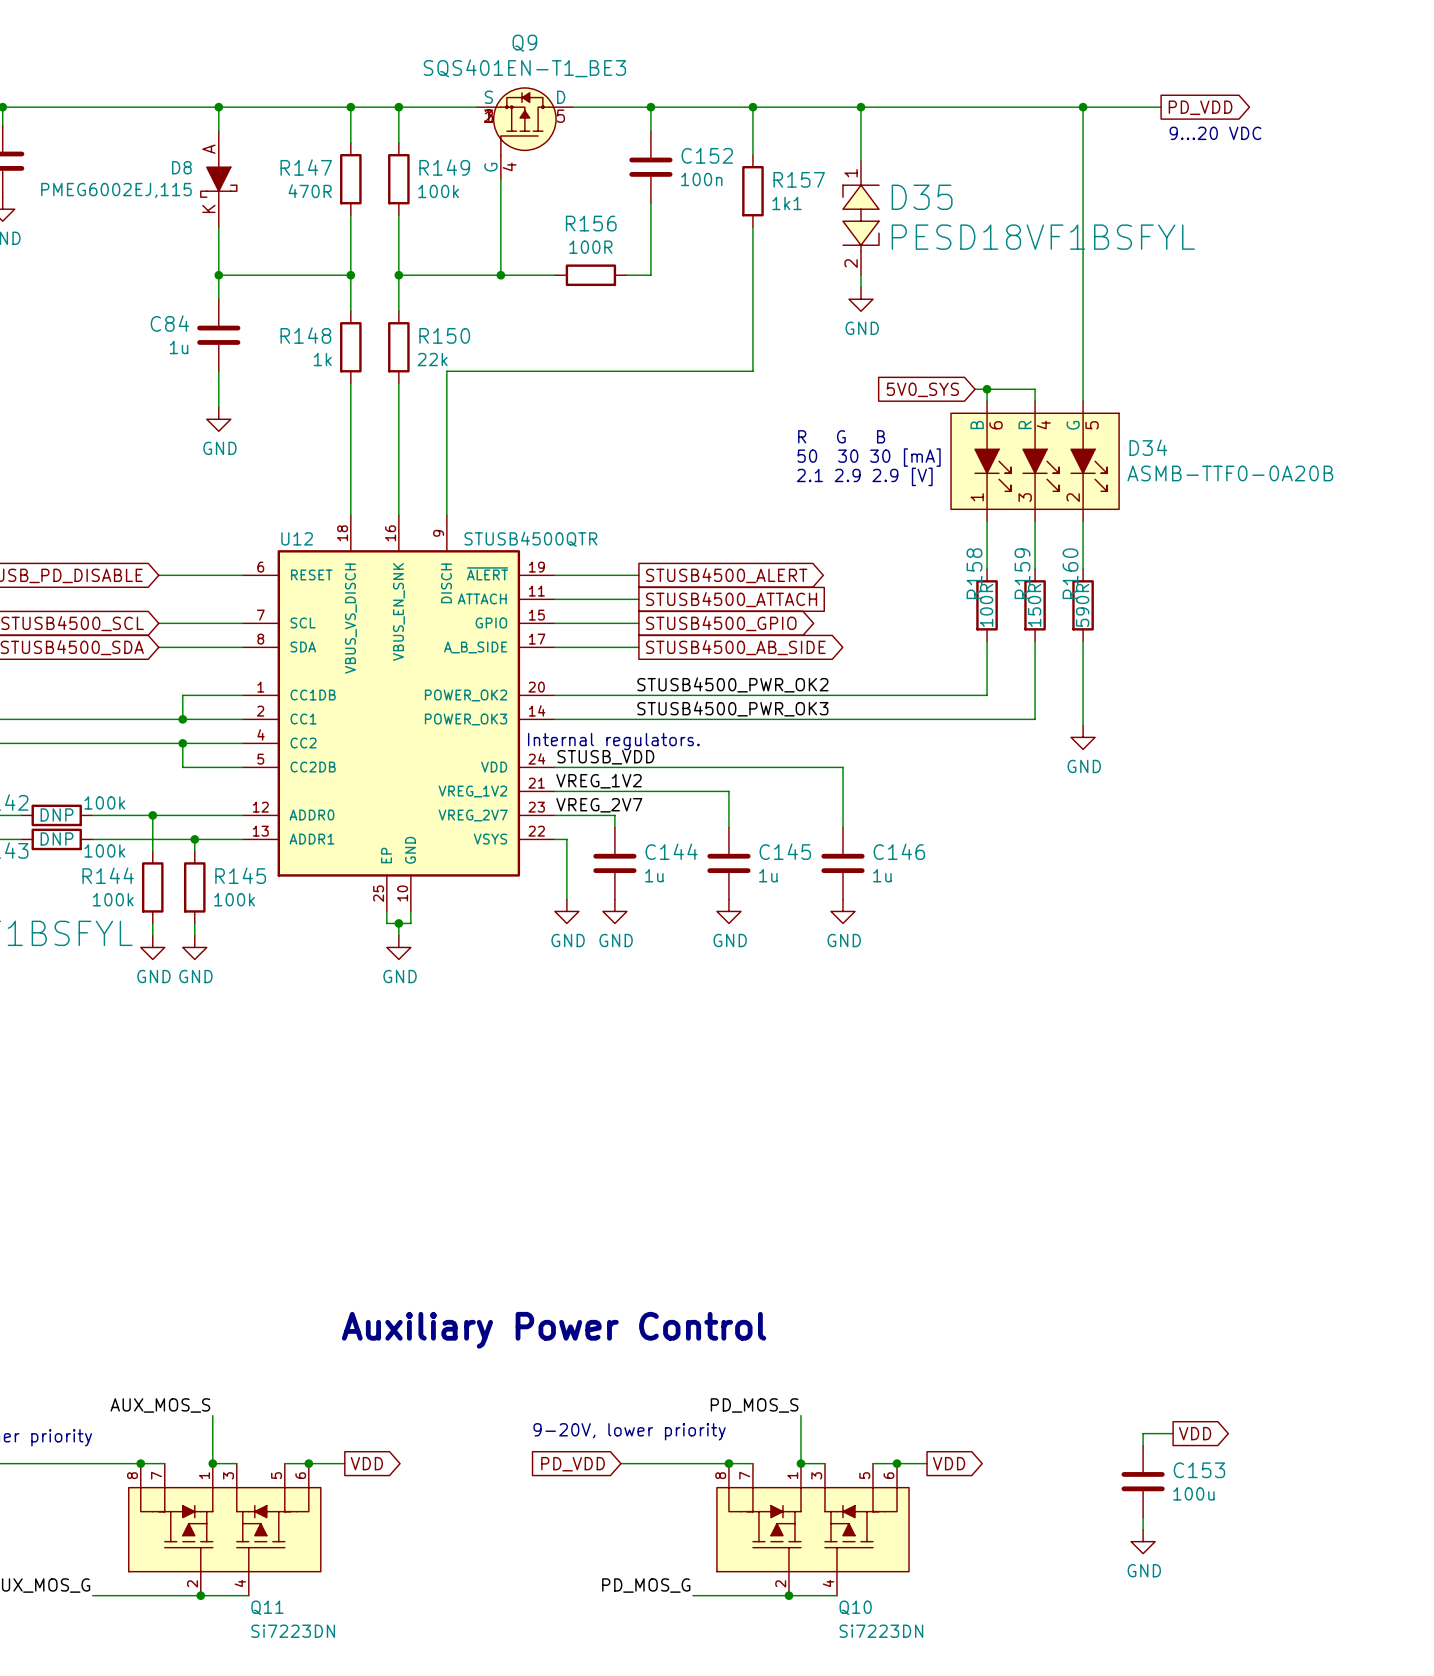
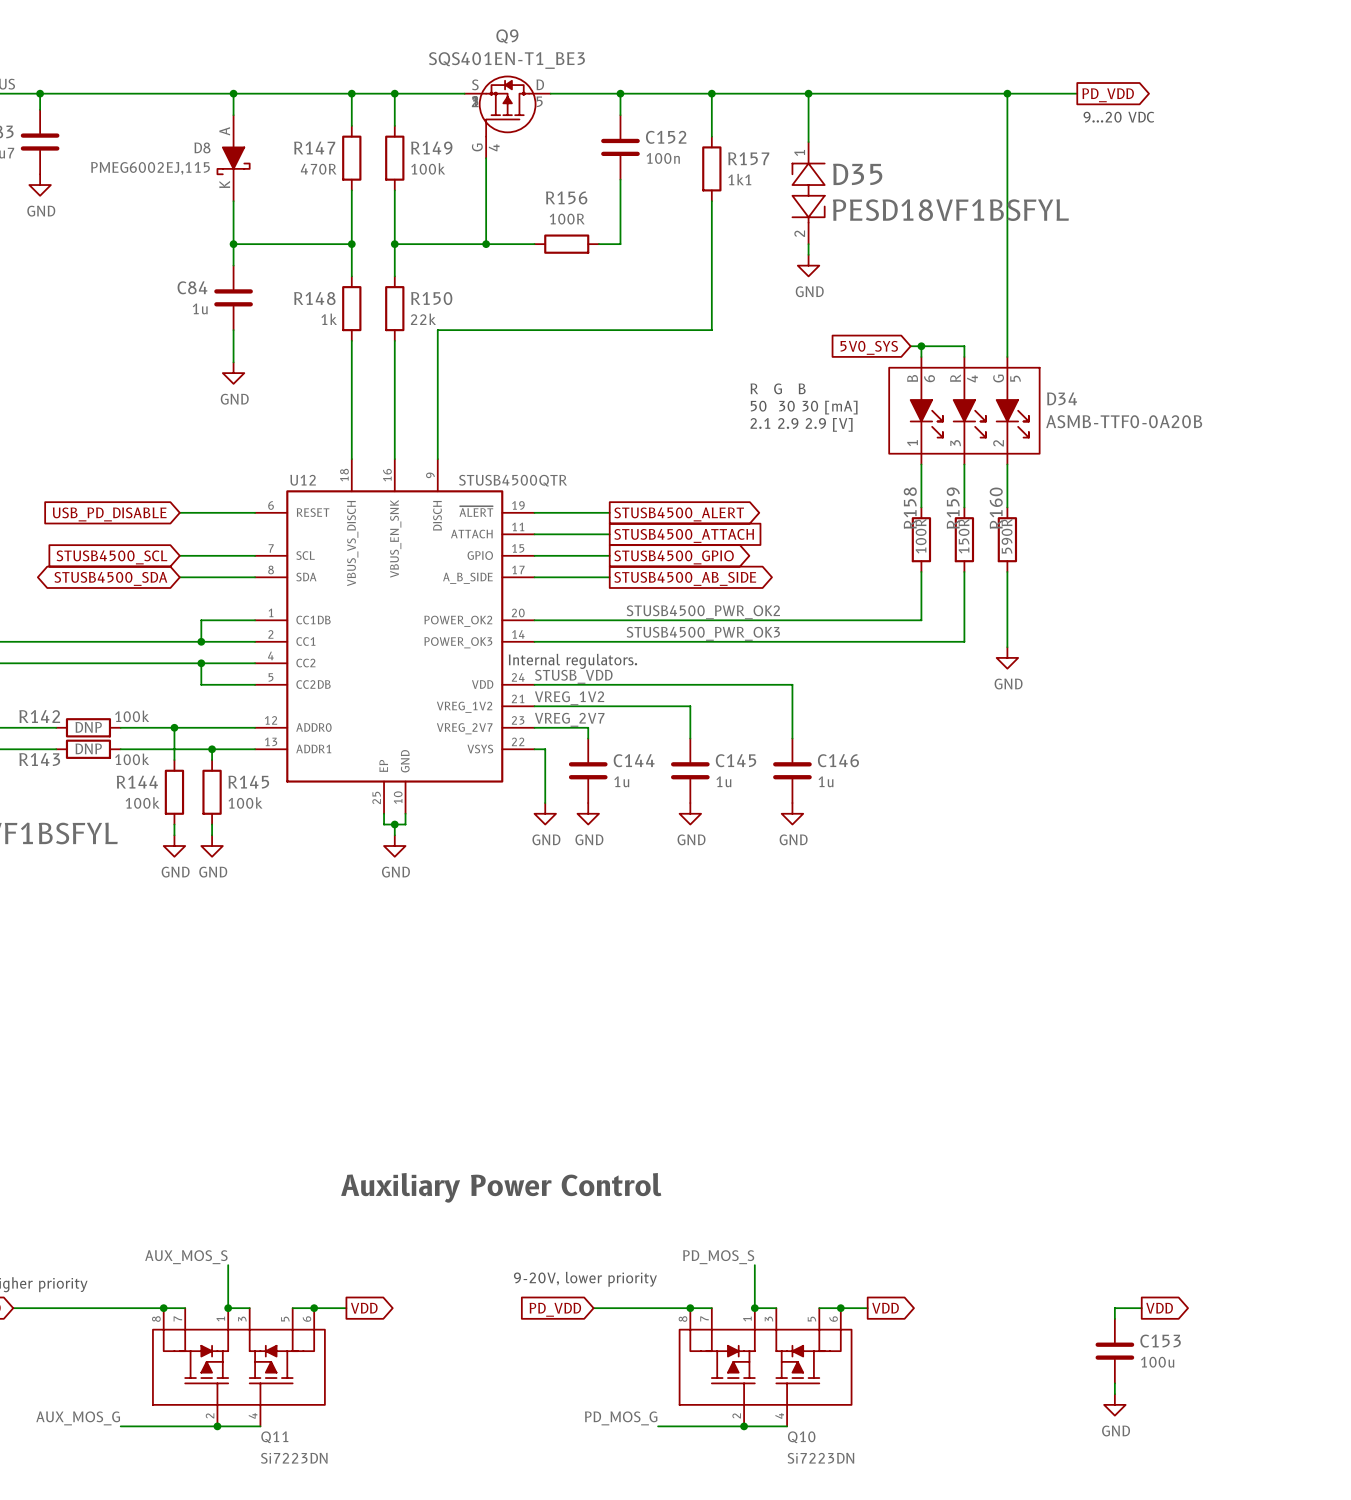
wire: (1173, 1433) (1143, 1433) (1143, 1445) -> (1141, 1308) (1114, 1308) (1114, 1318)
global label position: VDD (1195, 1433) -> VDD (1159, 1308)
C153 position: (1143, 1481) -> (1114, 1351)
wire: (1143, 1517) (1143, 1529) -> (1114, 1383) (1114, 1394)
power symbol position: GND (1143, 1541) -> GND (1114, 1404)

